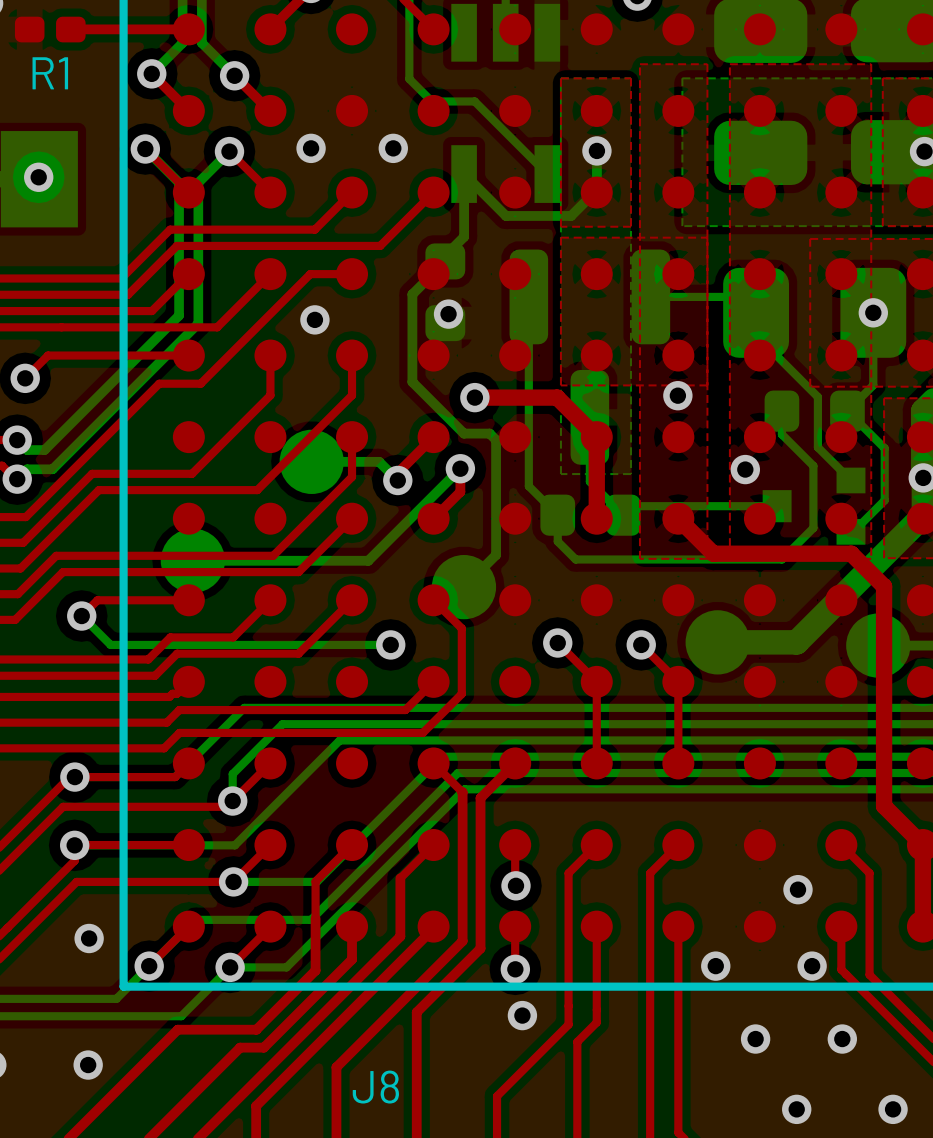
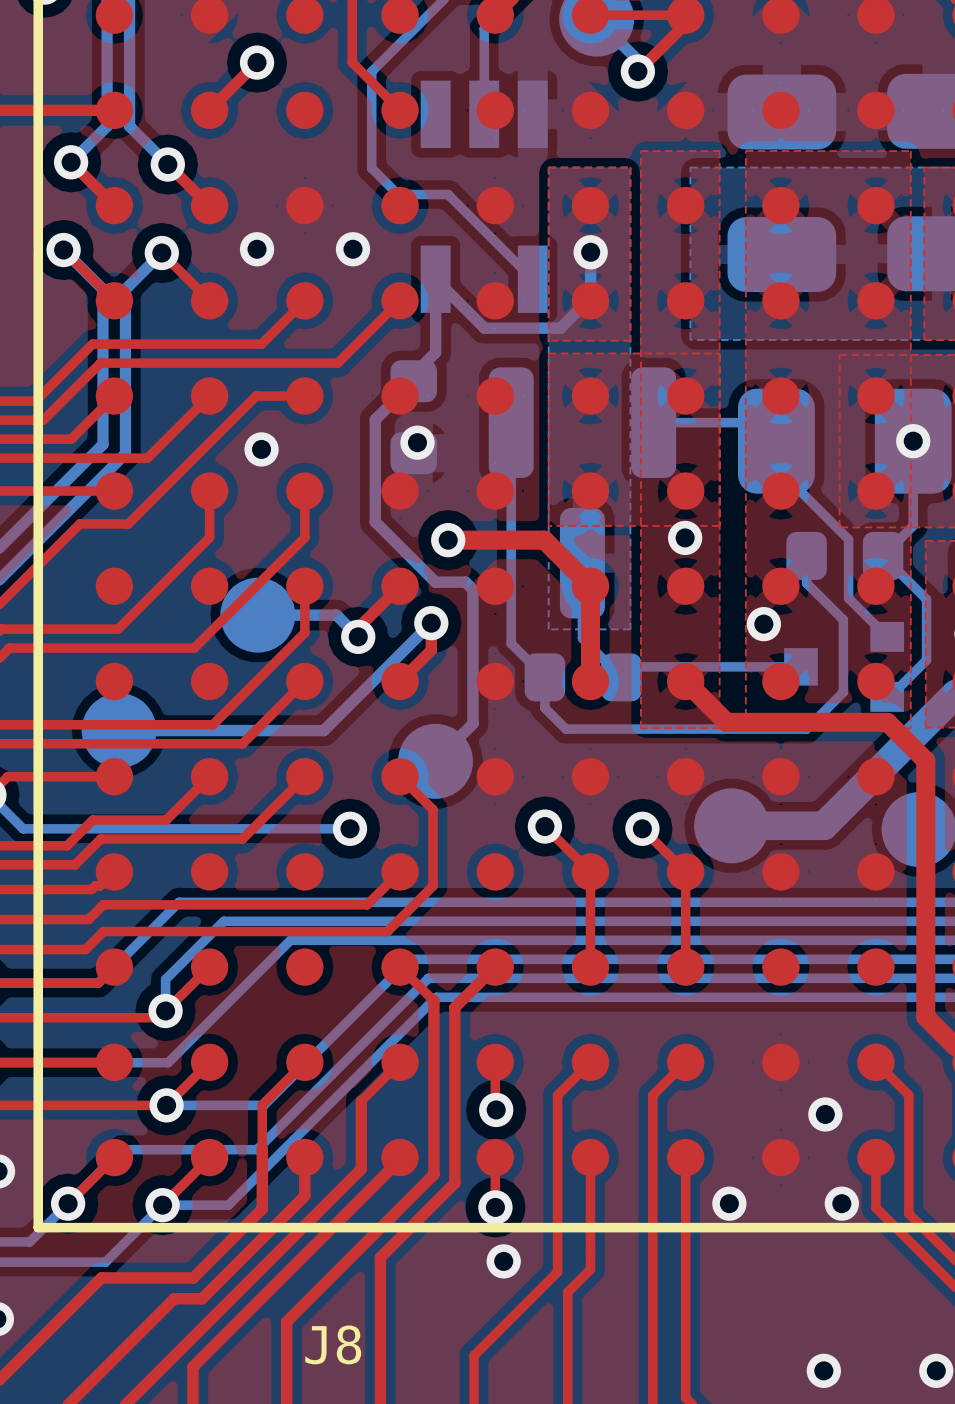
via: (755, 1039) -> none
via: (842, 1039) -> none

